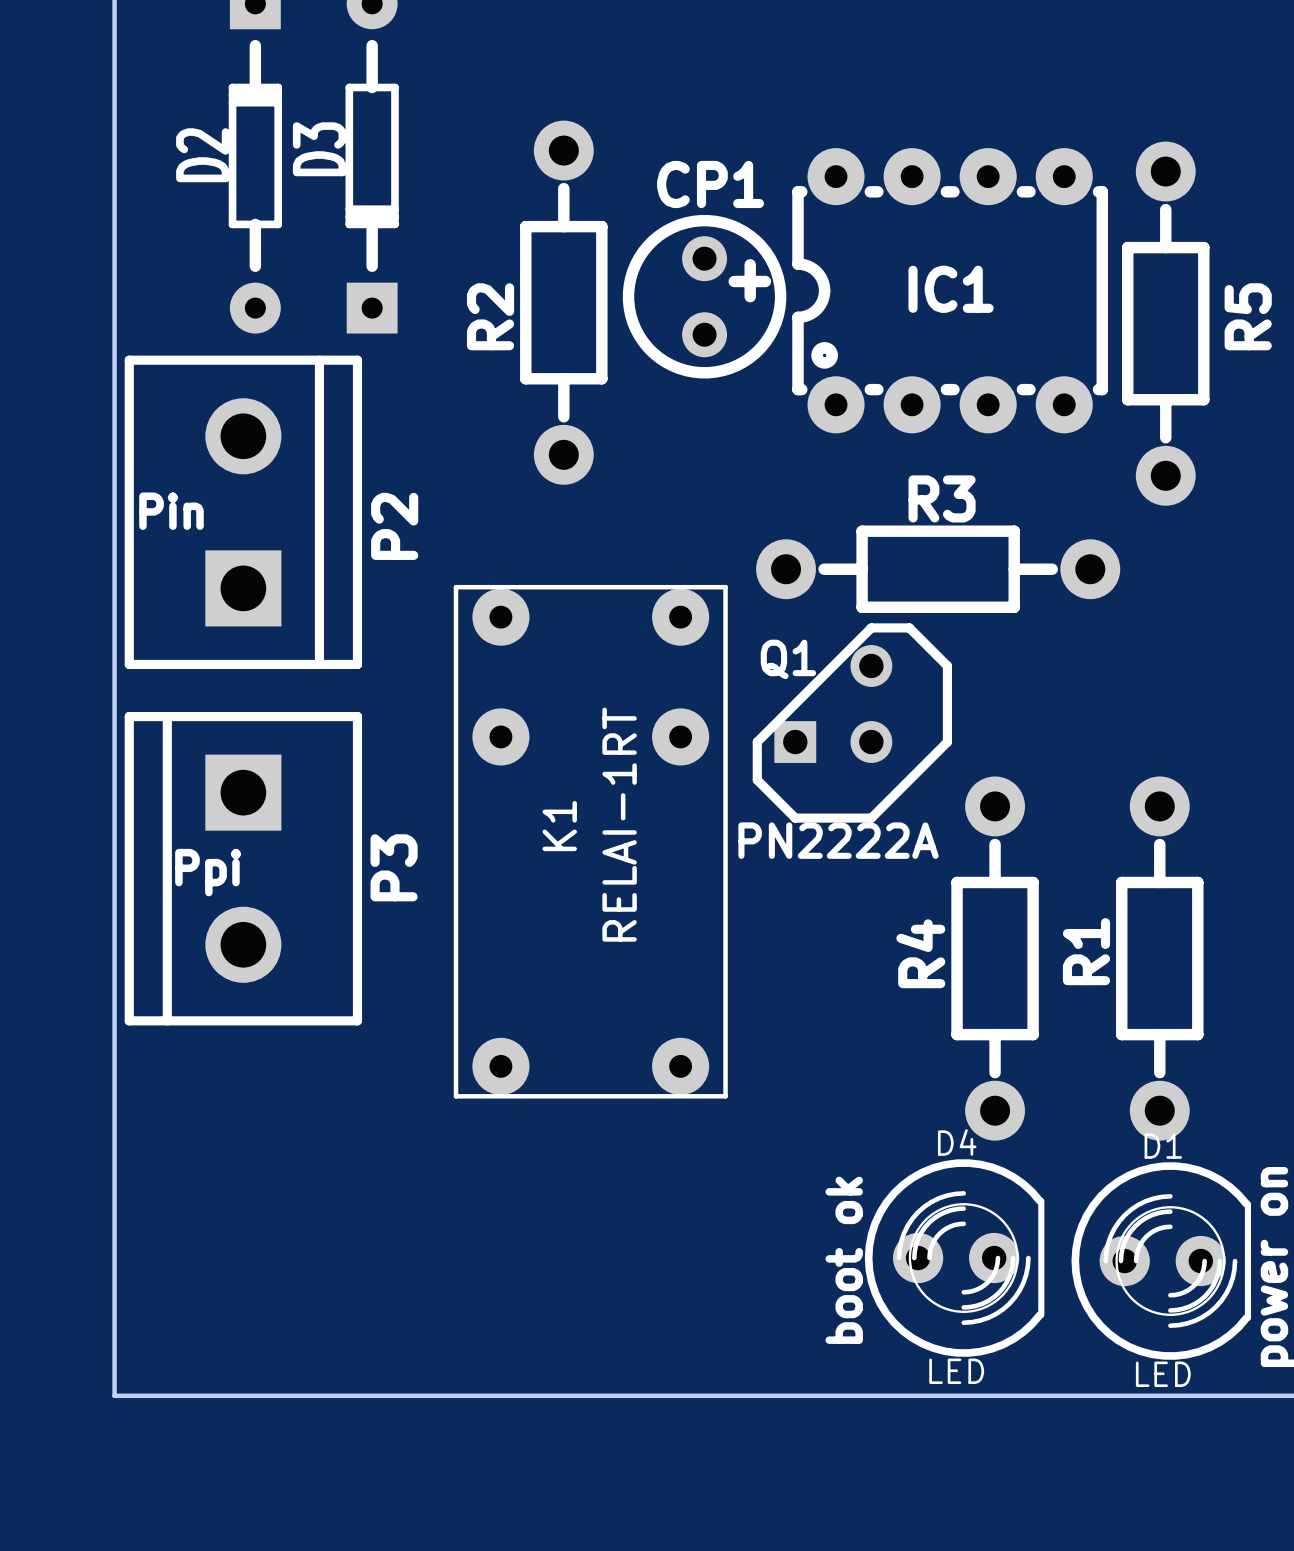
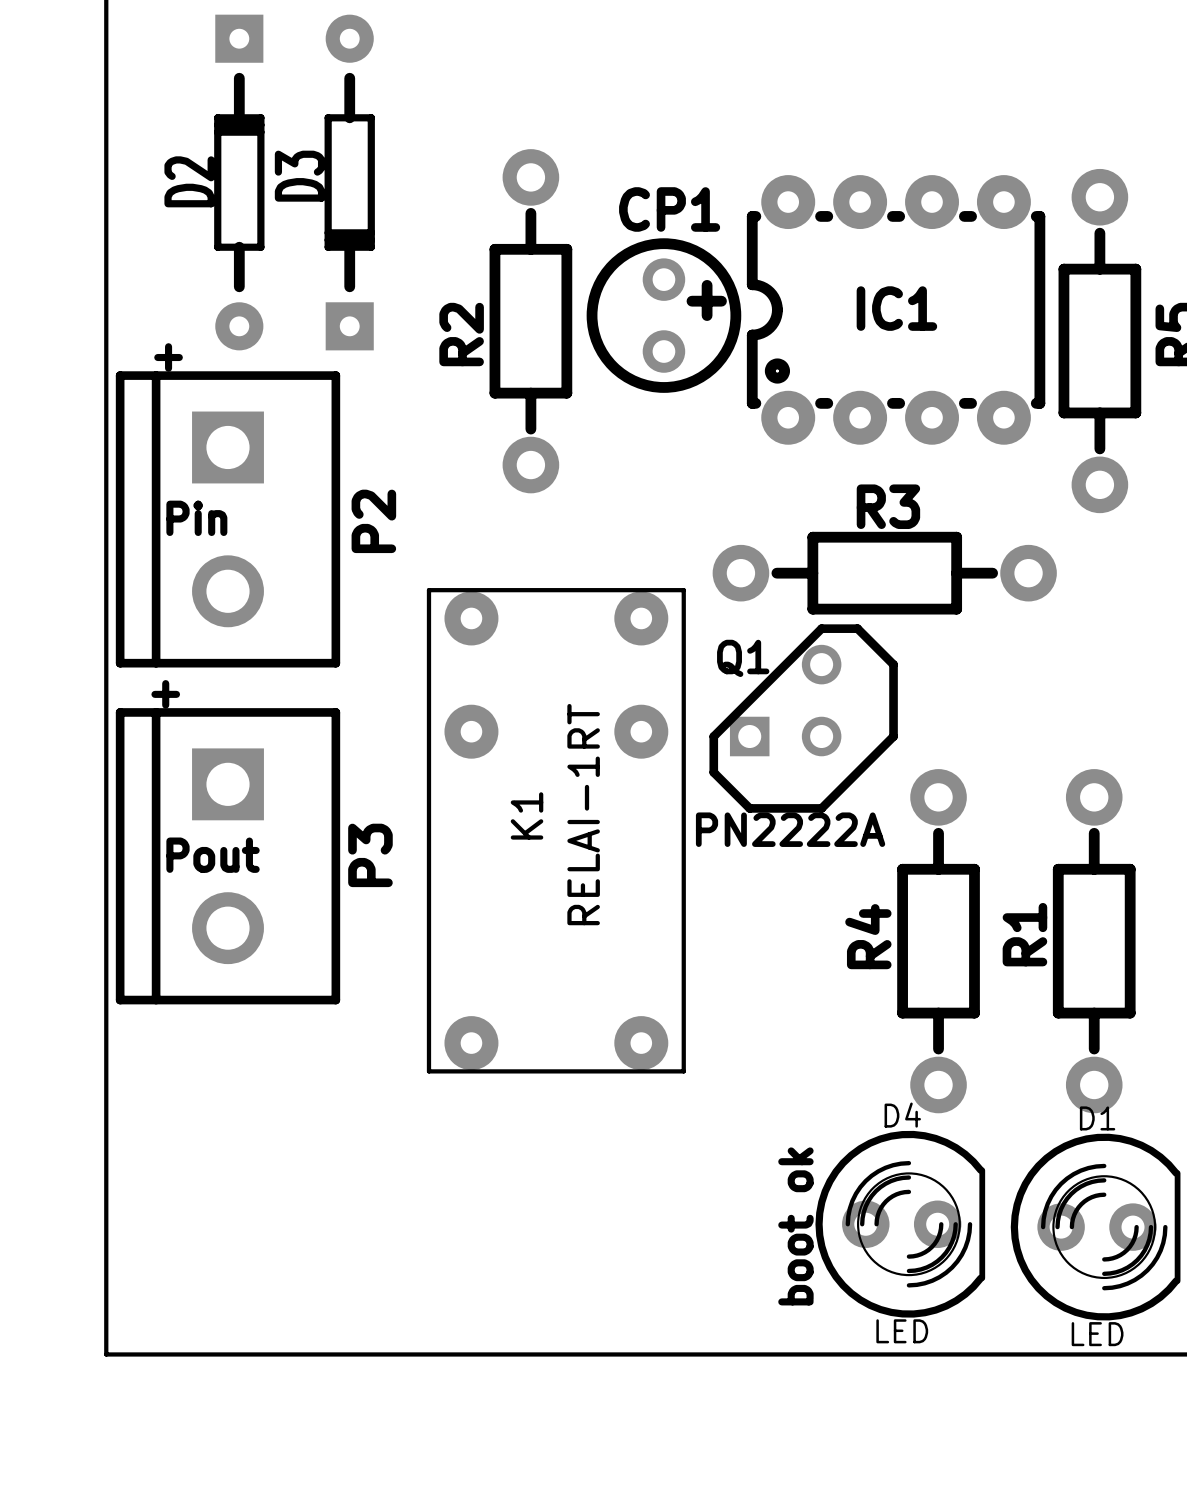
text: none -> + (168, 357)
text position: Pin (171, 511) -> Pin (196, 518)
P2 rotation: 0° (243, 512) -> 180° (228, 519)
text: none -> + (165, 694)
text: Ppi (208, 872) -> Pout (213, 855)

